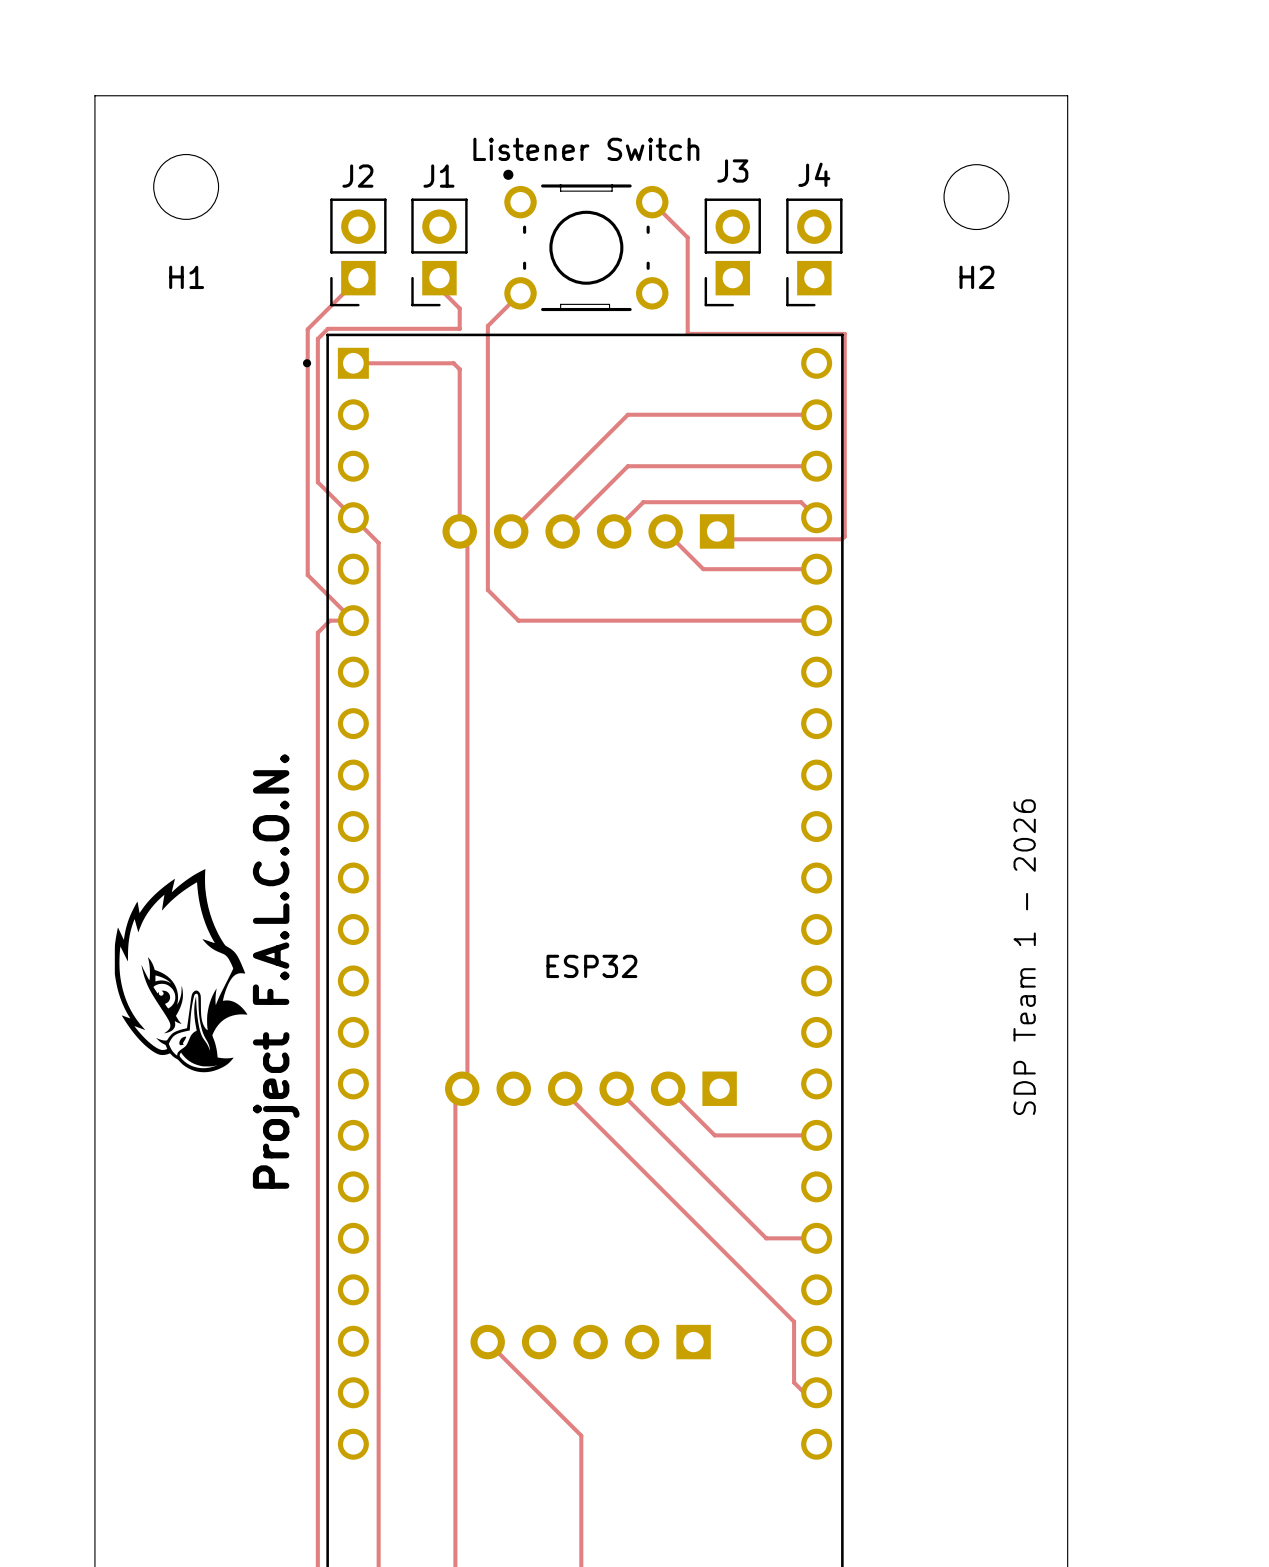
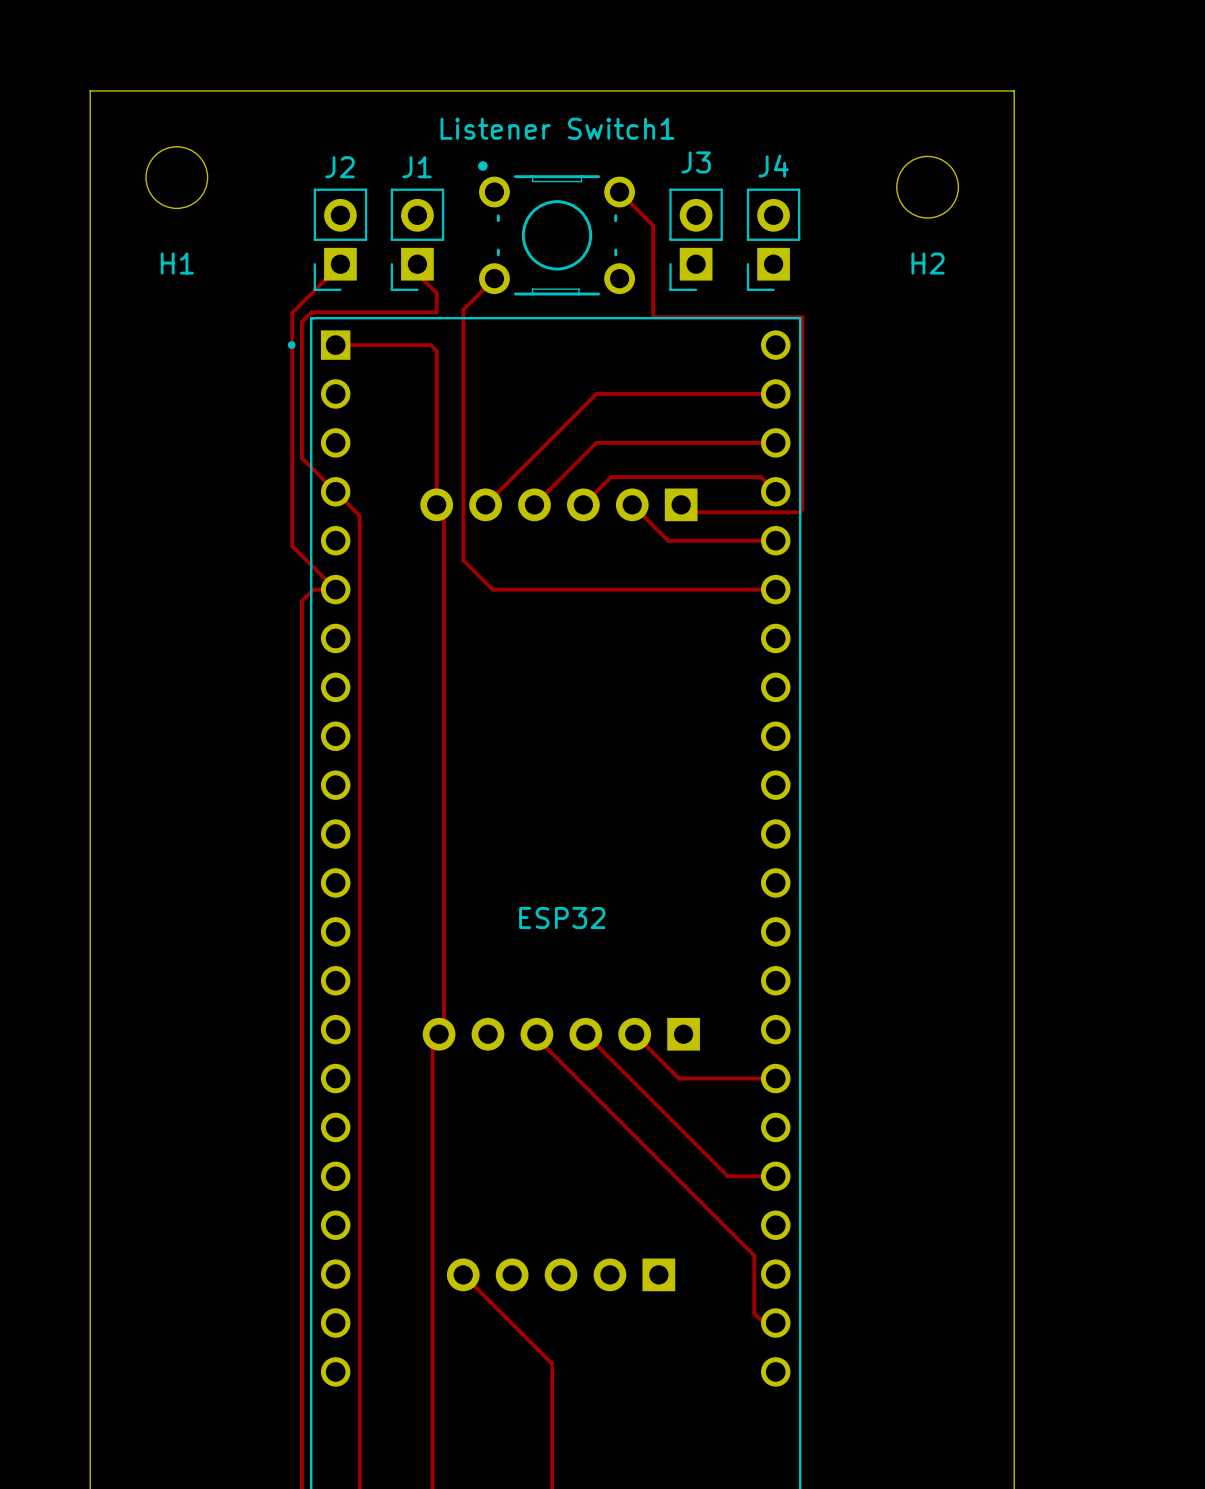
Listener Switch name: Listener Switch (586, 149) -> Listener Switch1 (557, 128)
text: SDP Team 1 - 2026 (1024, 957) -> none
Project F.A.L.C.O.N.: (181, 970) -> none

